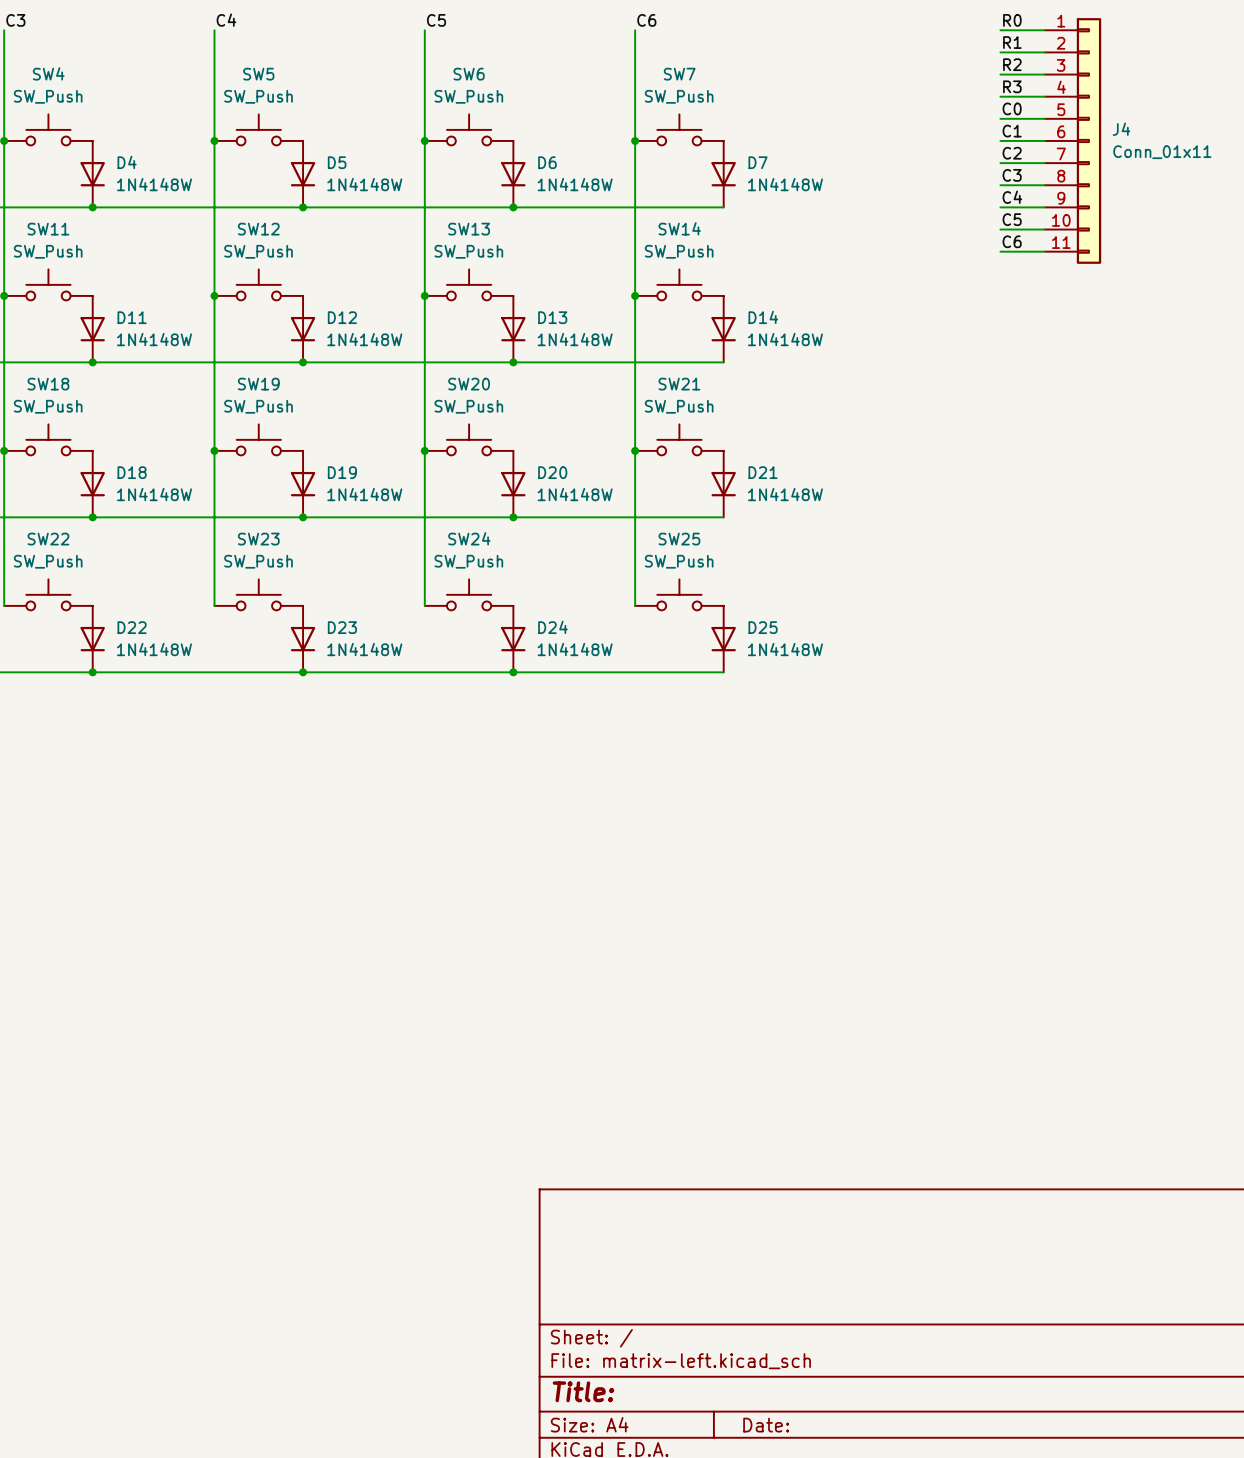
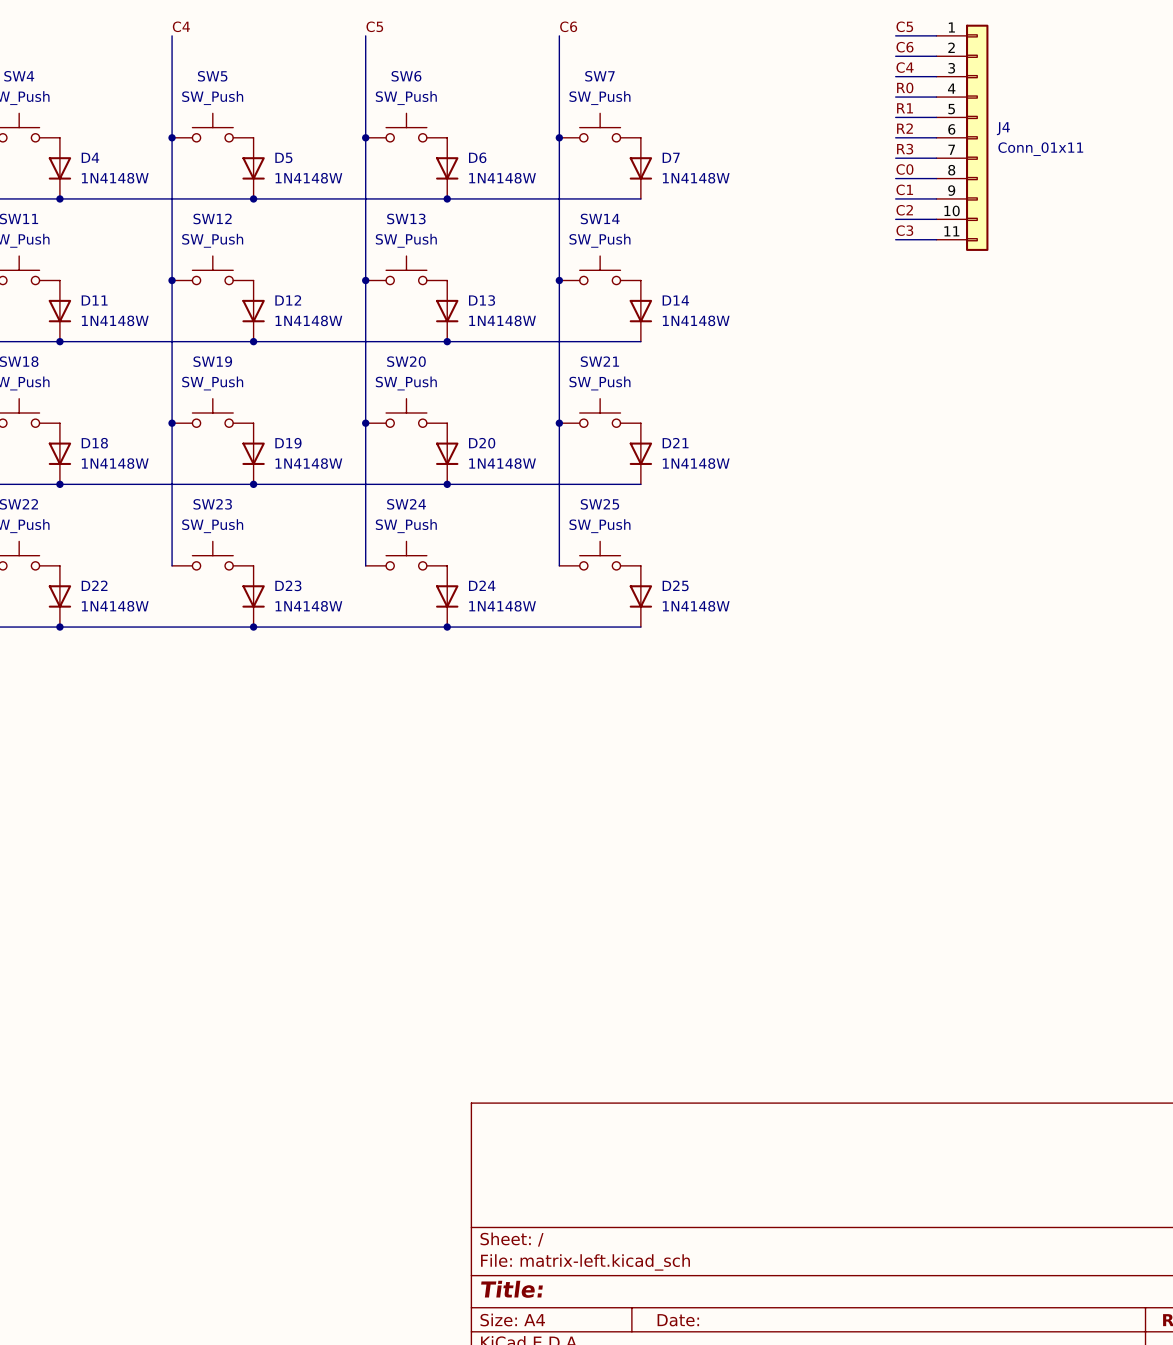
label: R0 (1012, 20) -> C5 (904, 26)
label: R1 (1012, 42) -> C6 (904, 47)
label: R2 (1012, 64) -> C4 (905, 67)
label: R3 (1012, 86) -> R0 (905, 87)
label: C0 (1012, 108) -> R1 (905, 108)
label: C1 (1012, 131) -> R2 (904, 128)
label: C2 (1012, 153) -> R3 (905, 149)
label: C3 (1012, 175) -> C0 (904, 169)
label: C4 (1012, 197) -> C1 (904, 189)
label: C5 (1012, 219) -> C2 (904, 210)
label: C6 (1012, 241) -> C3 (904, 230)

